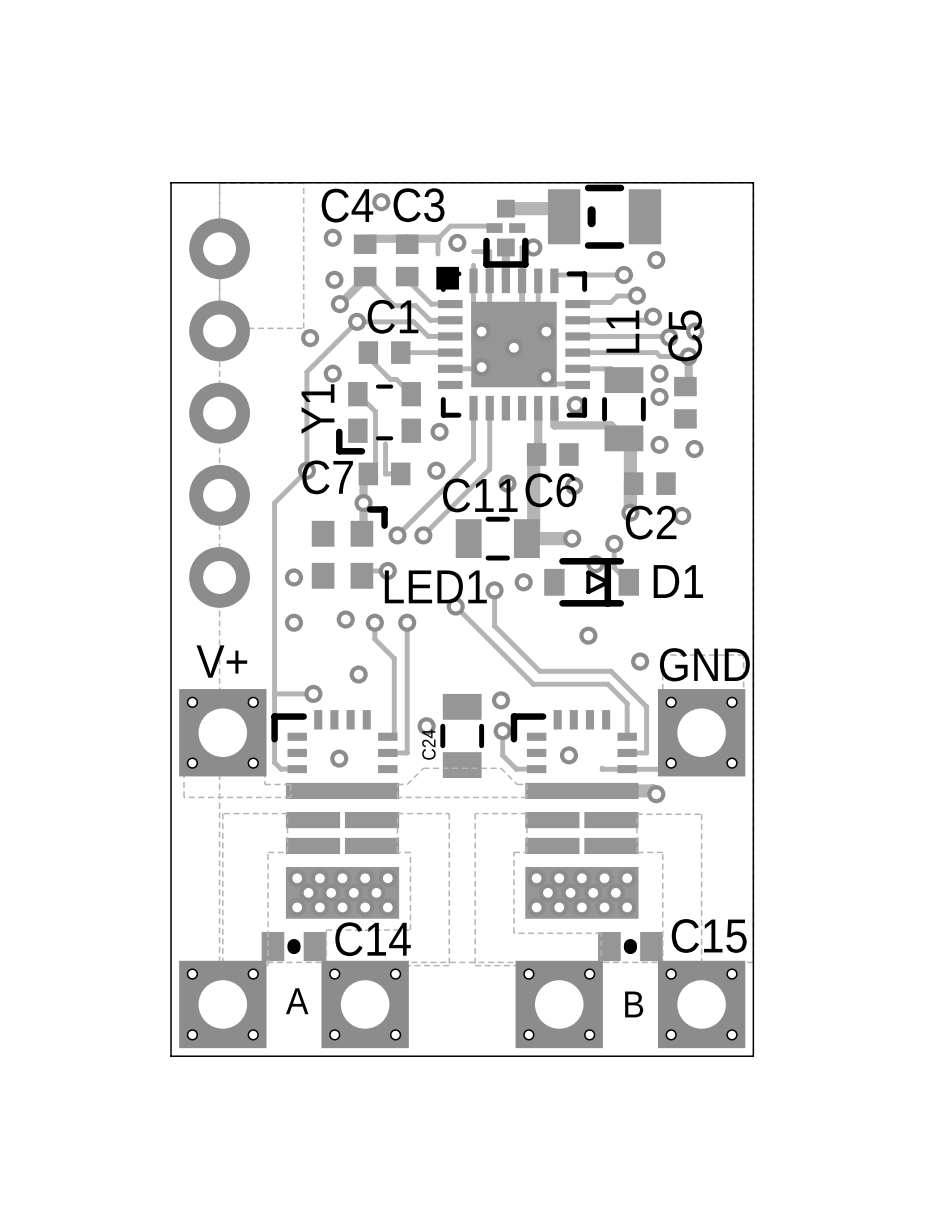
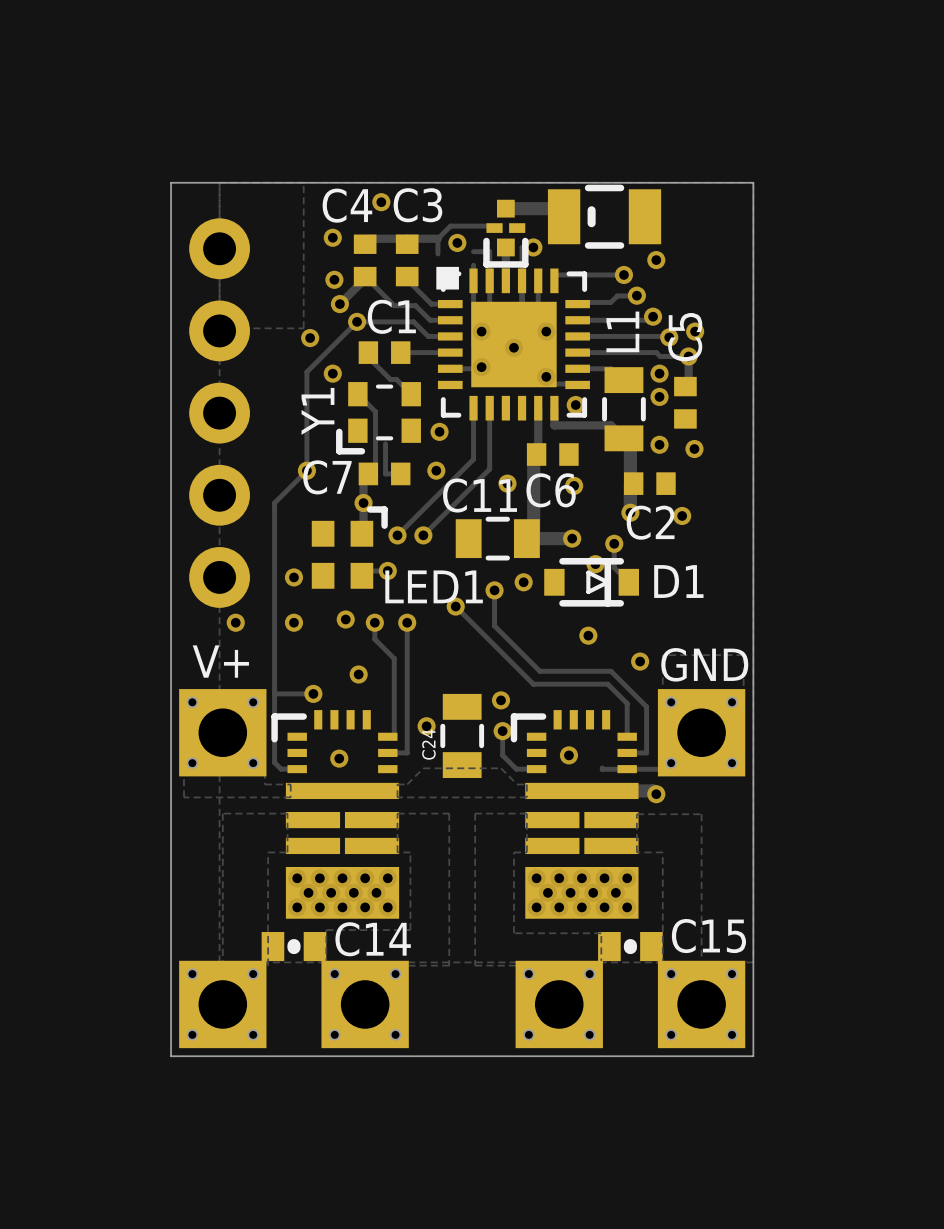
via: none -> (235, 622)
text: A (297, 1001) -> none
text: B (634, 1004) -> none

